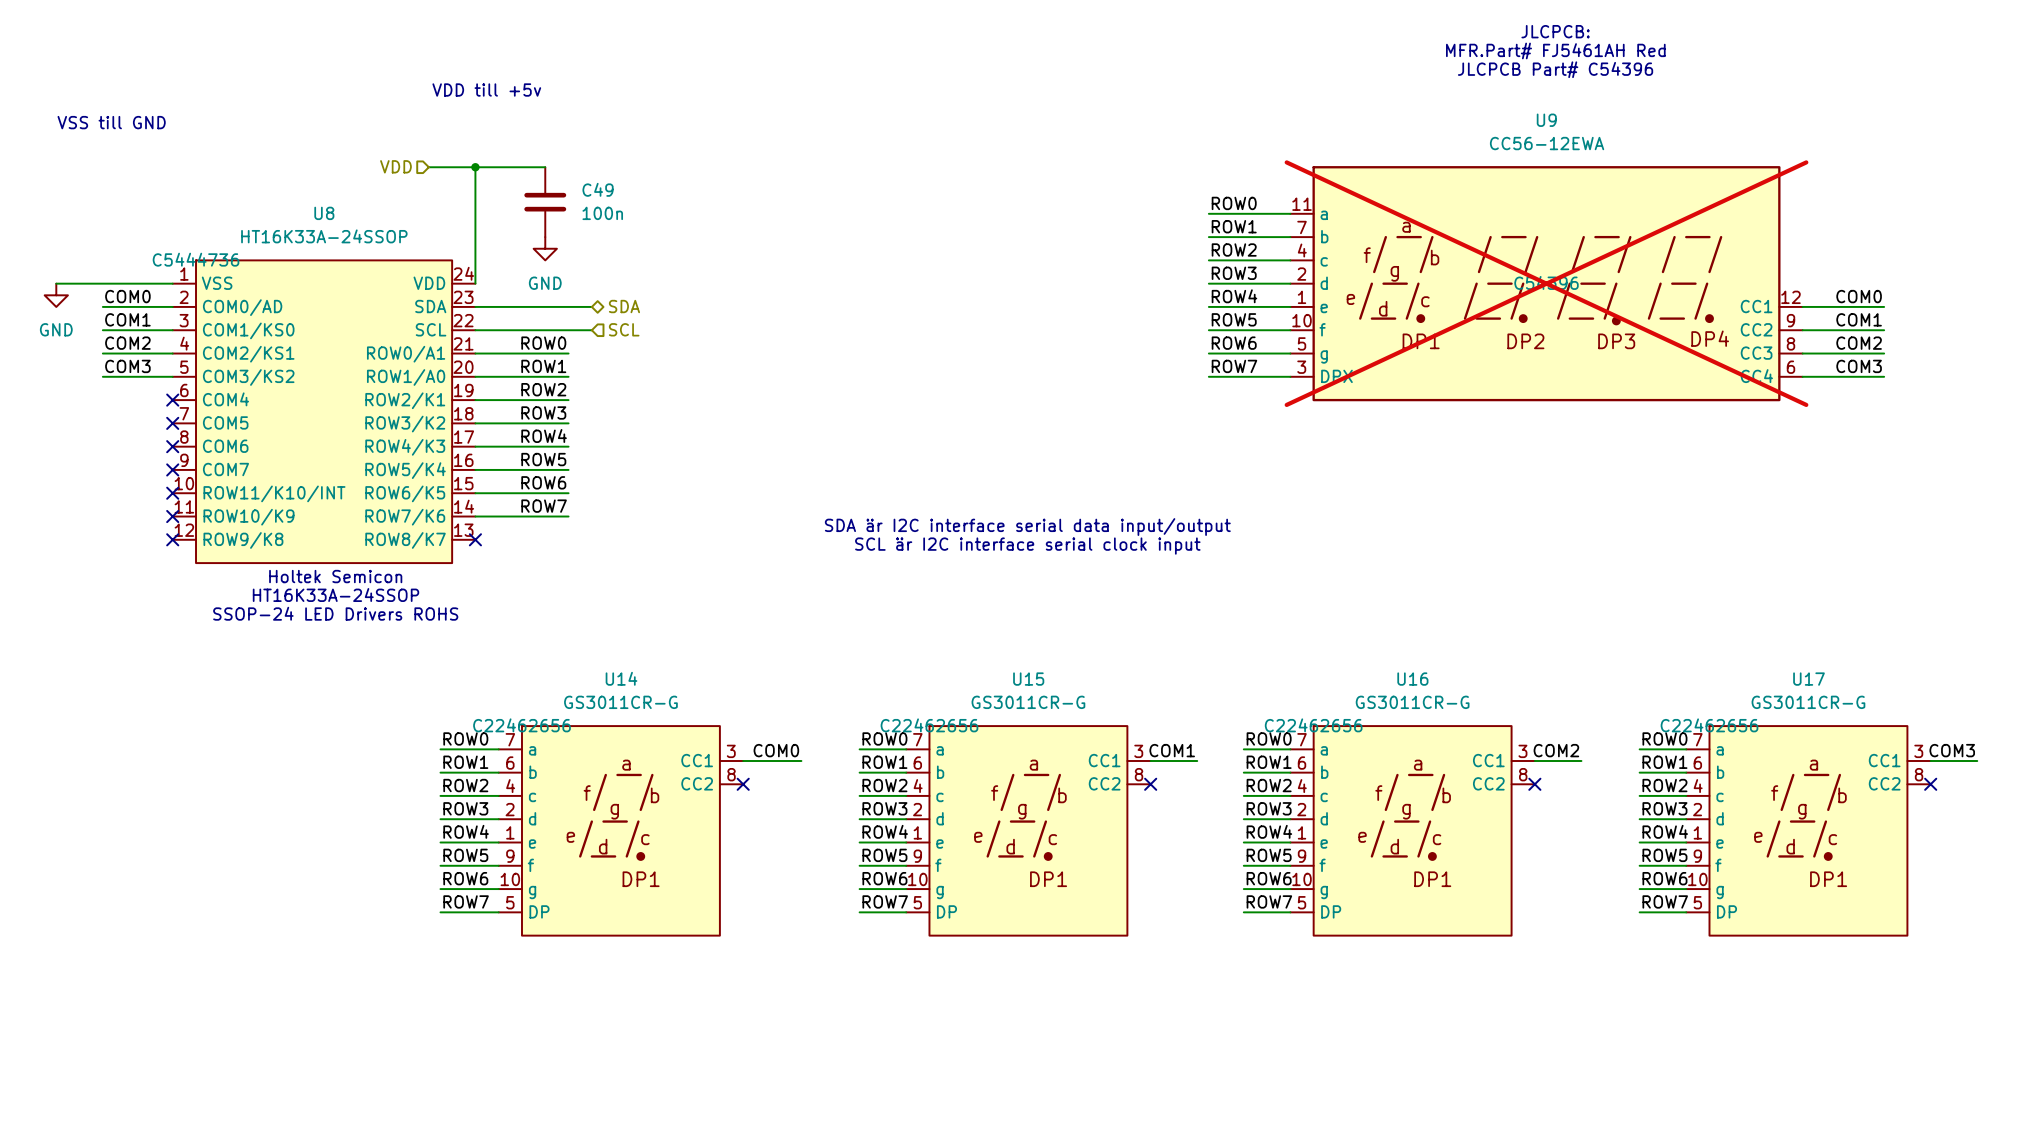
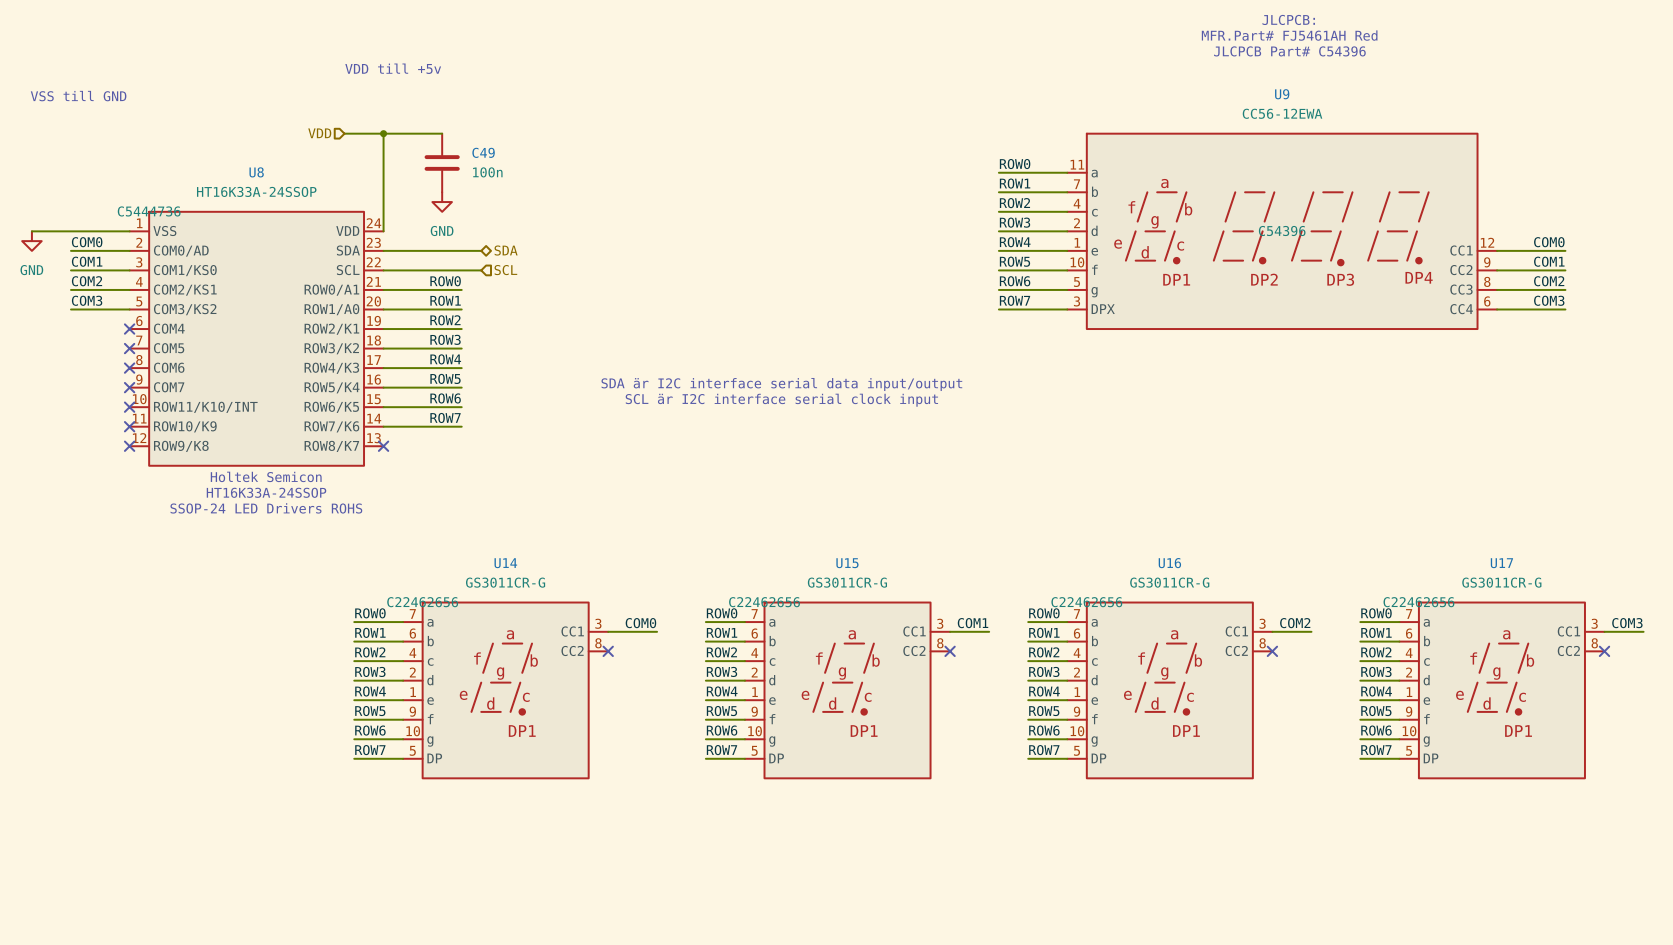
U9 do-not-place cross: (1546, 283) -> none
text position: SDA är I2C interface serial data input/output (1027, 527) -> SDA är I2C interface serial data input/output (781, 384)
text position: SCL är I2C interface serial clock input (1027, 546) -> SCL är I2C interface serial clock input (781, 400)

